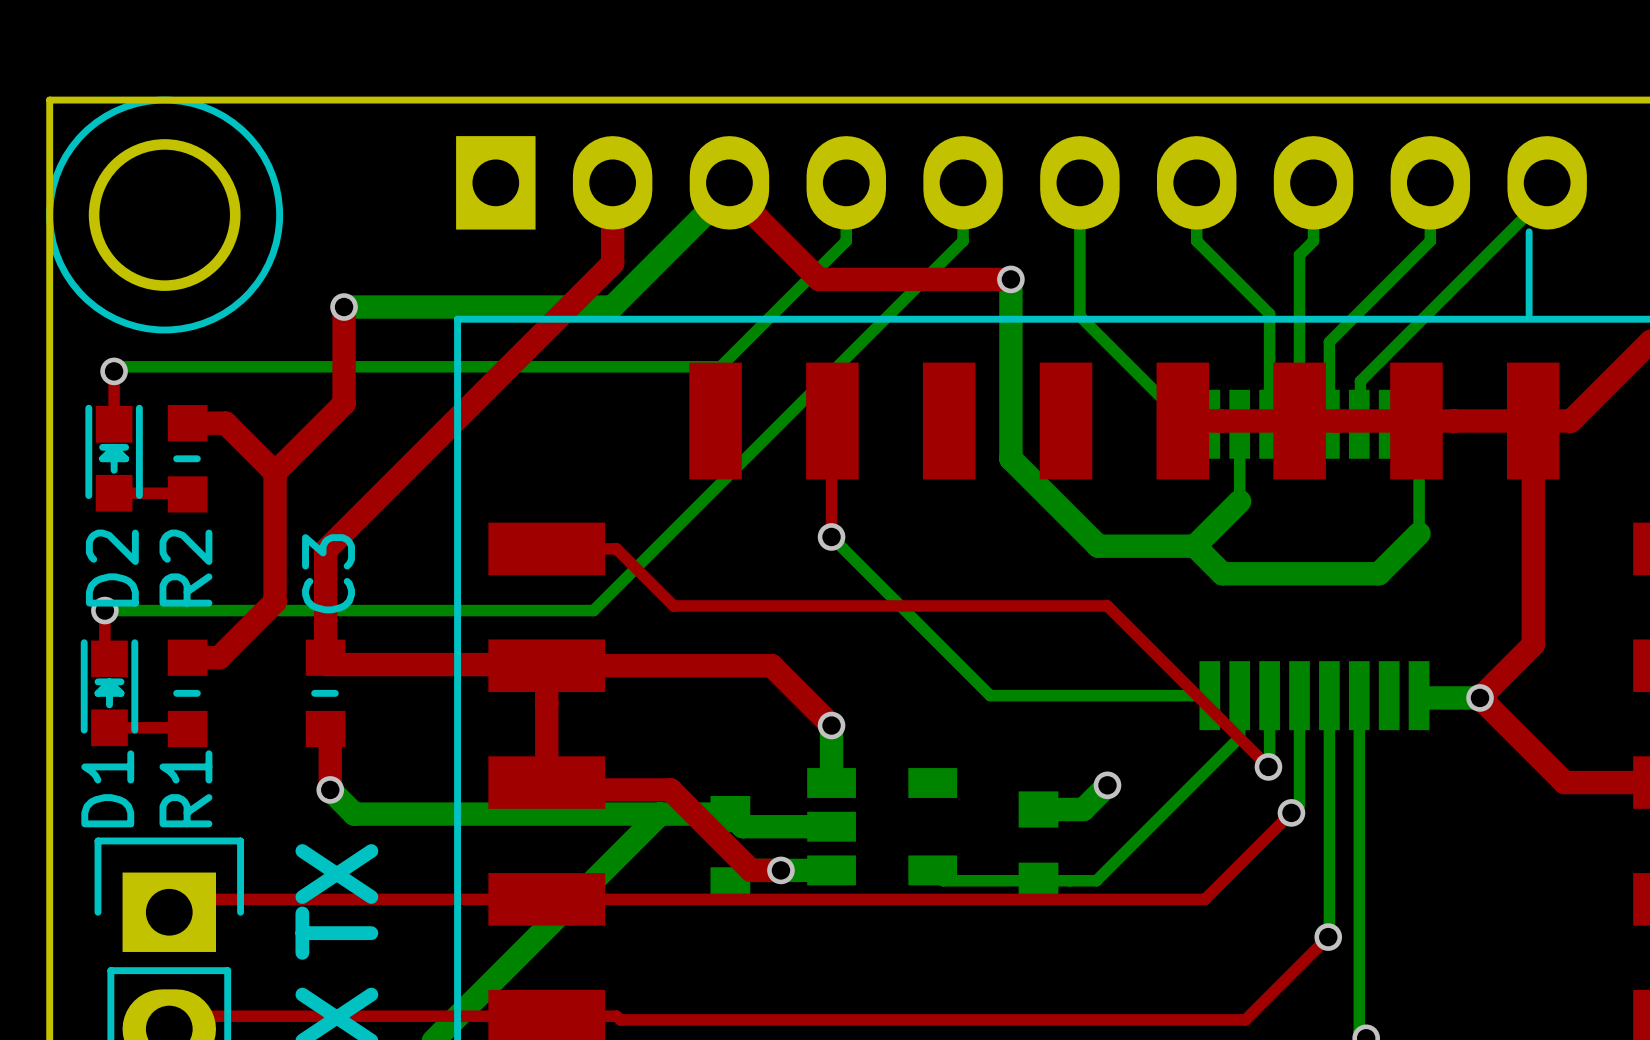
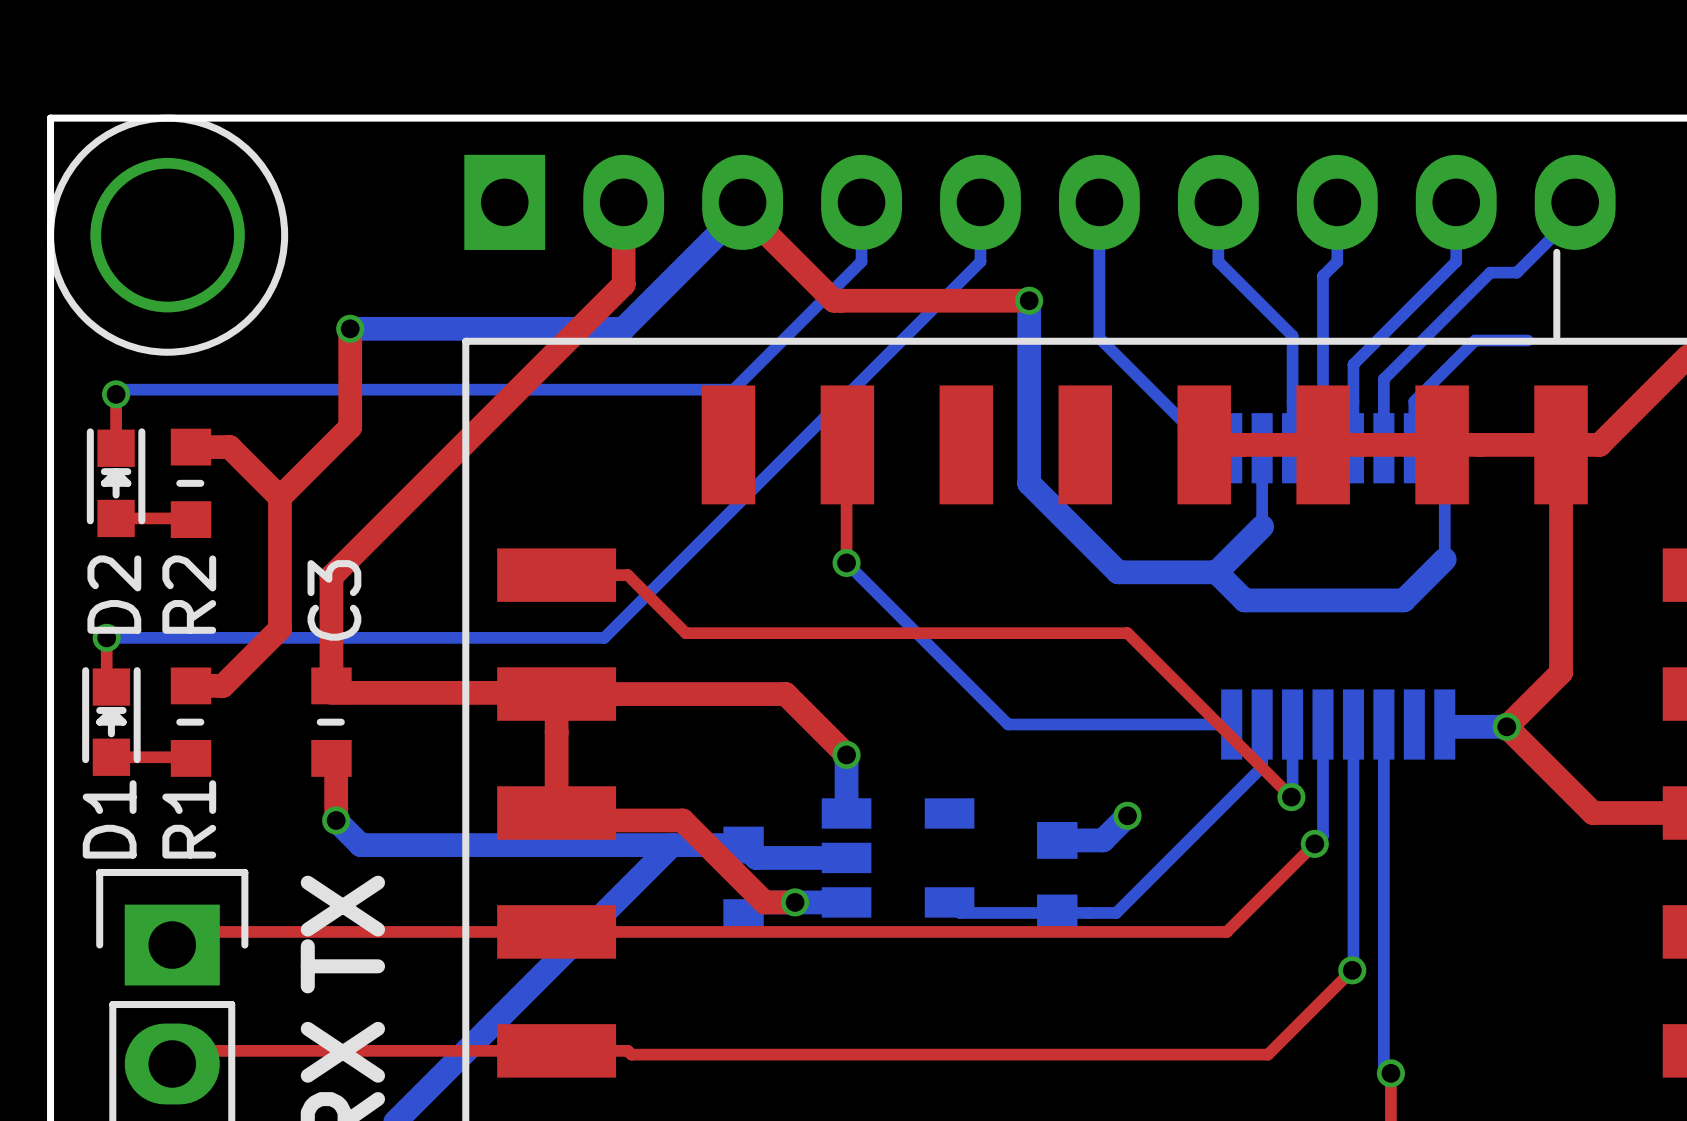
bottom track: (1489, 251) (1360, 381) (1359, 424) -> (1516, 272) (1490, 272) (1383, 379) (1383, 448)
bottom track: none -> (1527, 340) (1475, 340) (1414, 401) (1414, 448)

